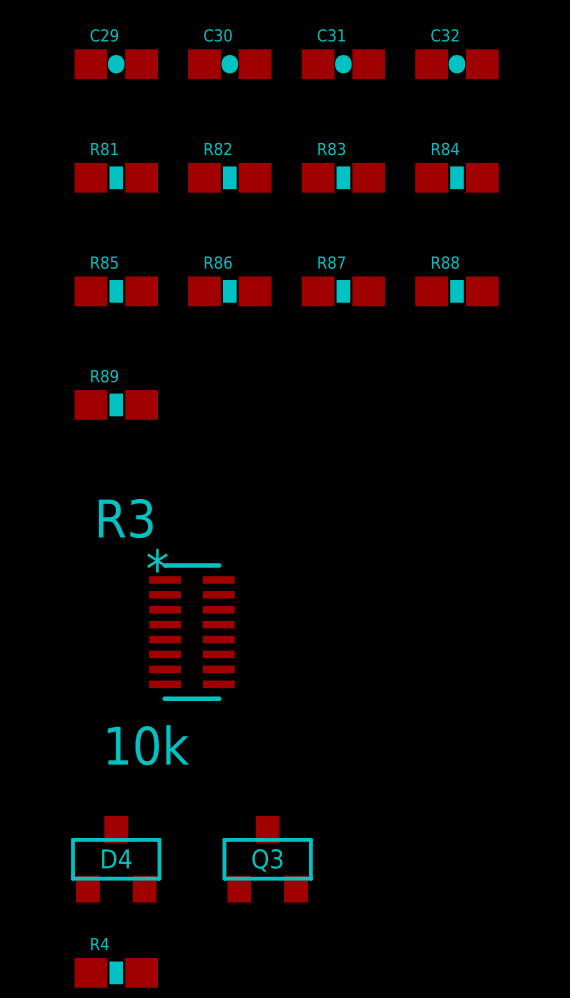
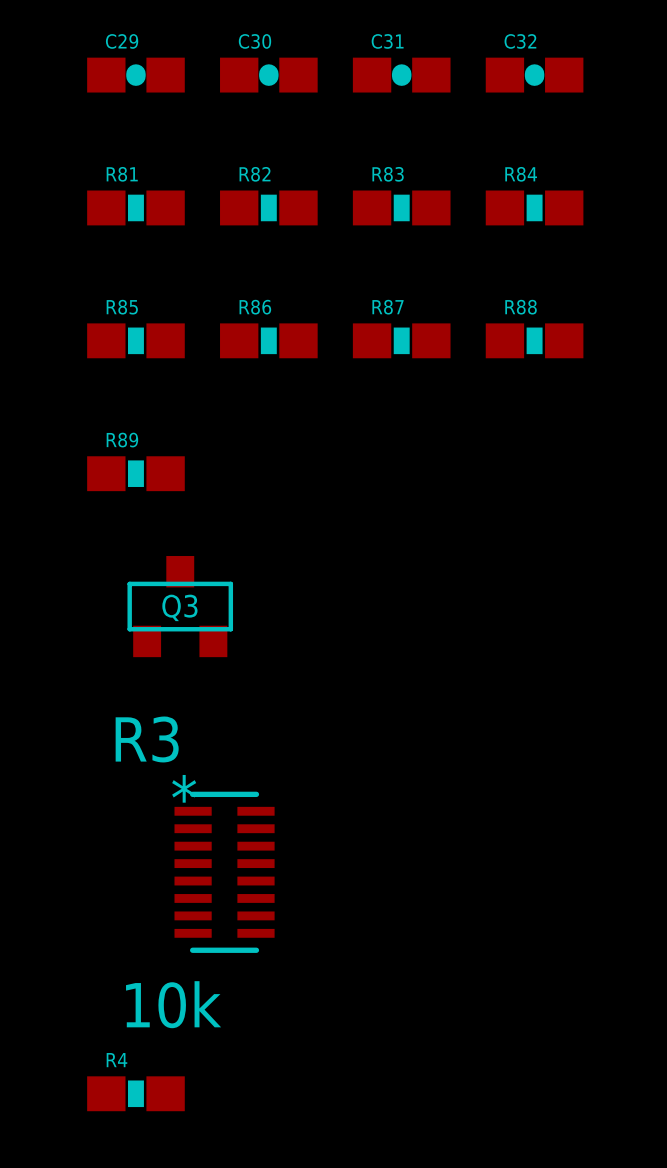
R3 position: (191, 632) -> (224, 872)
D4: (116, 859) -> none
Q3 position: (267, 859) -> (180, 606)
R4 position: (116, 972) -> (135, 1093)

